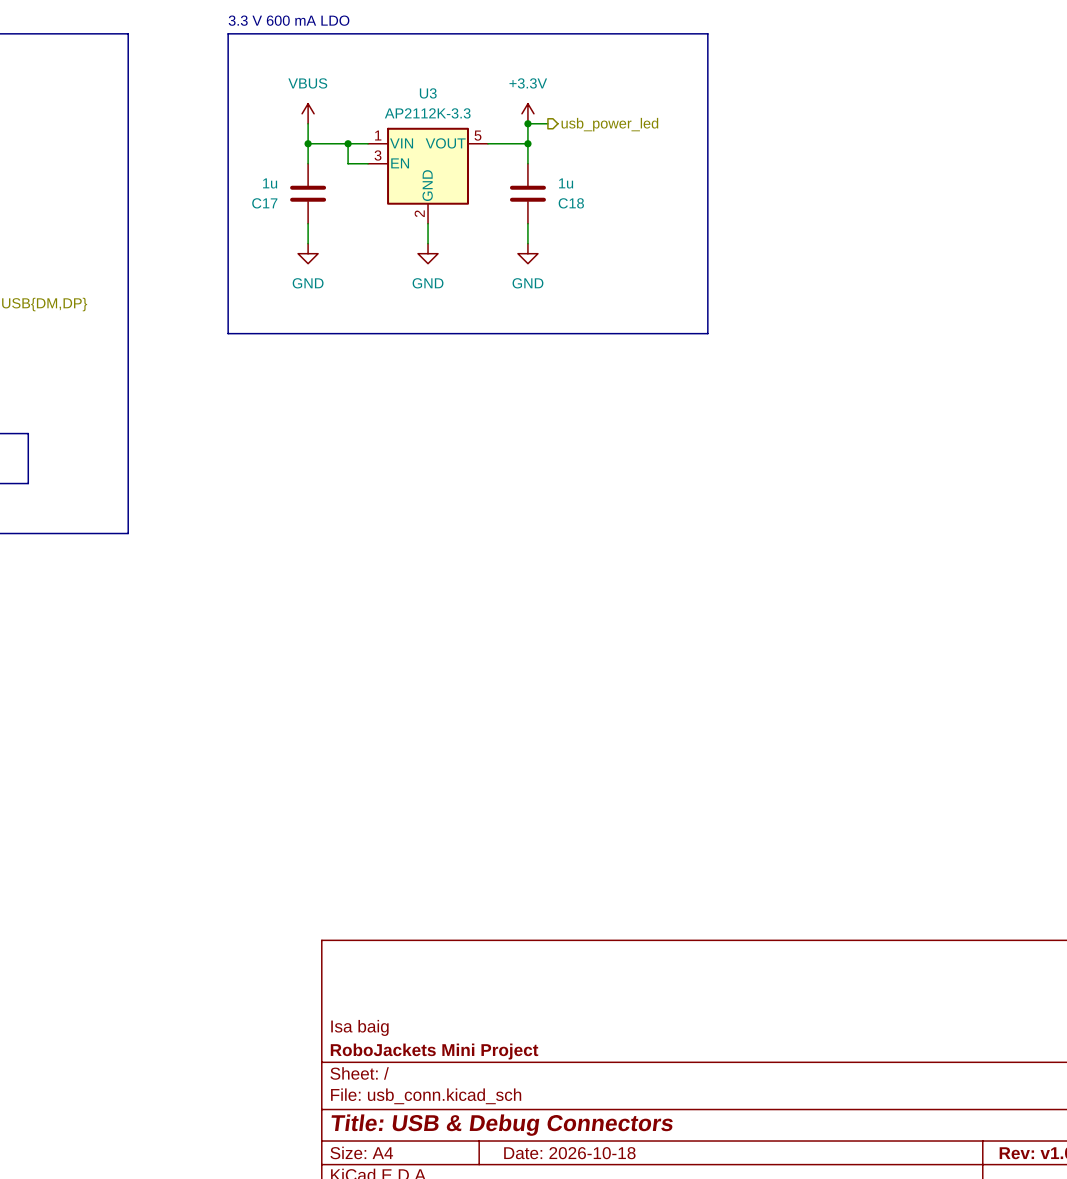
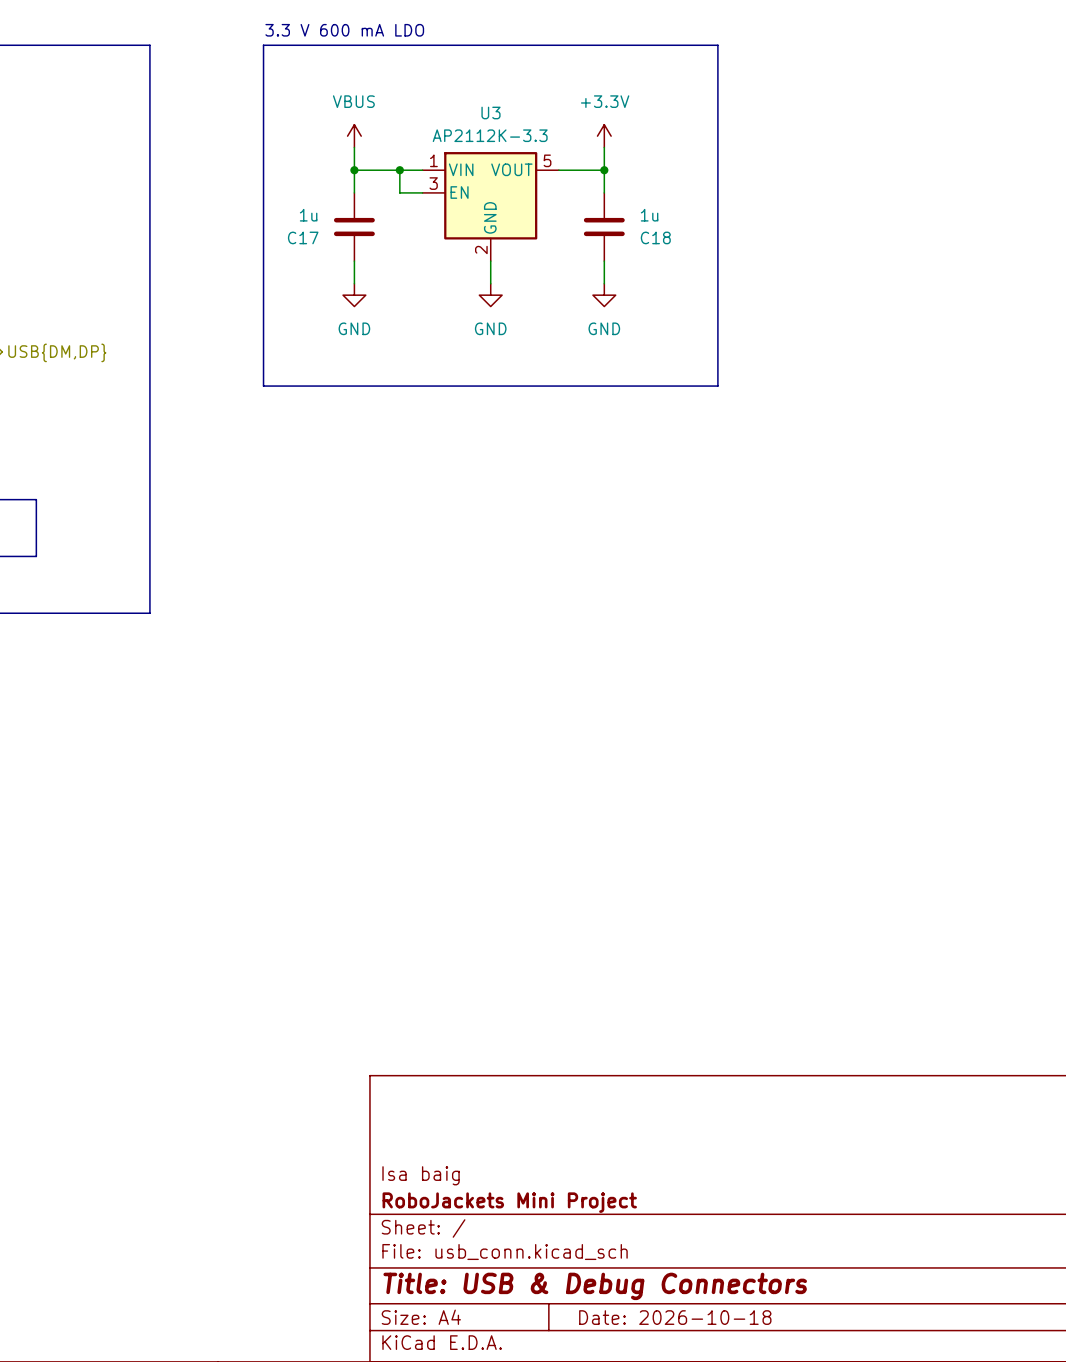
line: (627, 33) (707, 33) (707, 333) (627, 333) -> (717, 45) (717, 386)
wire: (527, 123) (547, 123) -> none
junction: (527, 123) -> none
hierarchical label: usb_power_led (609, 124) -> none

